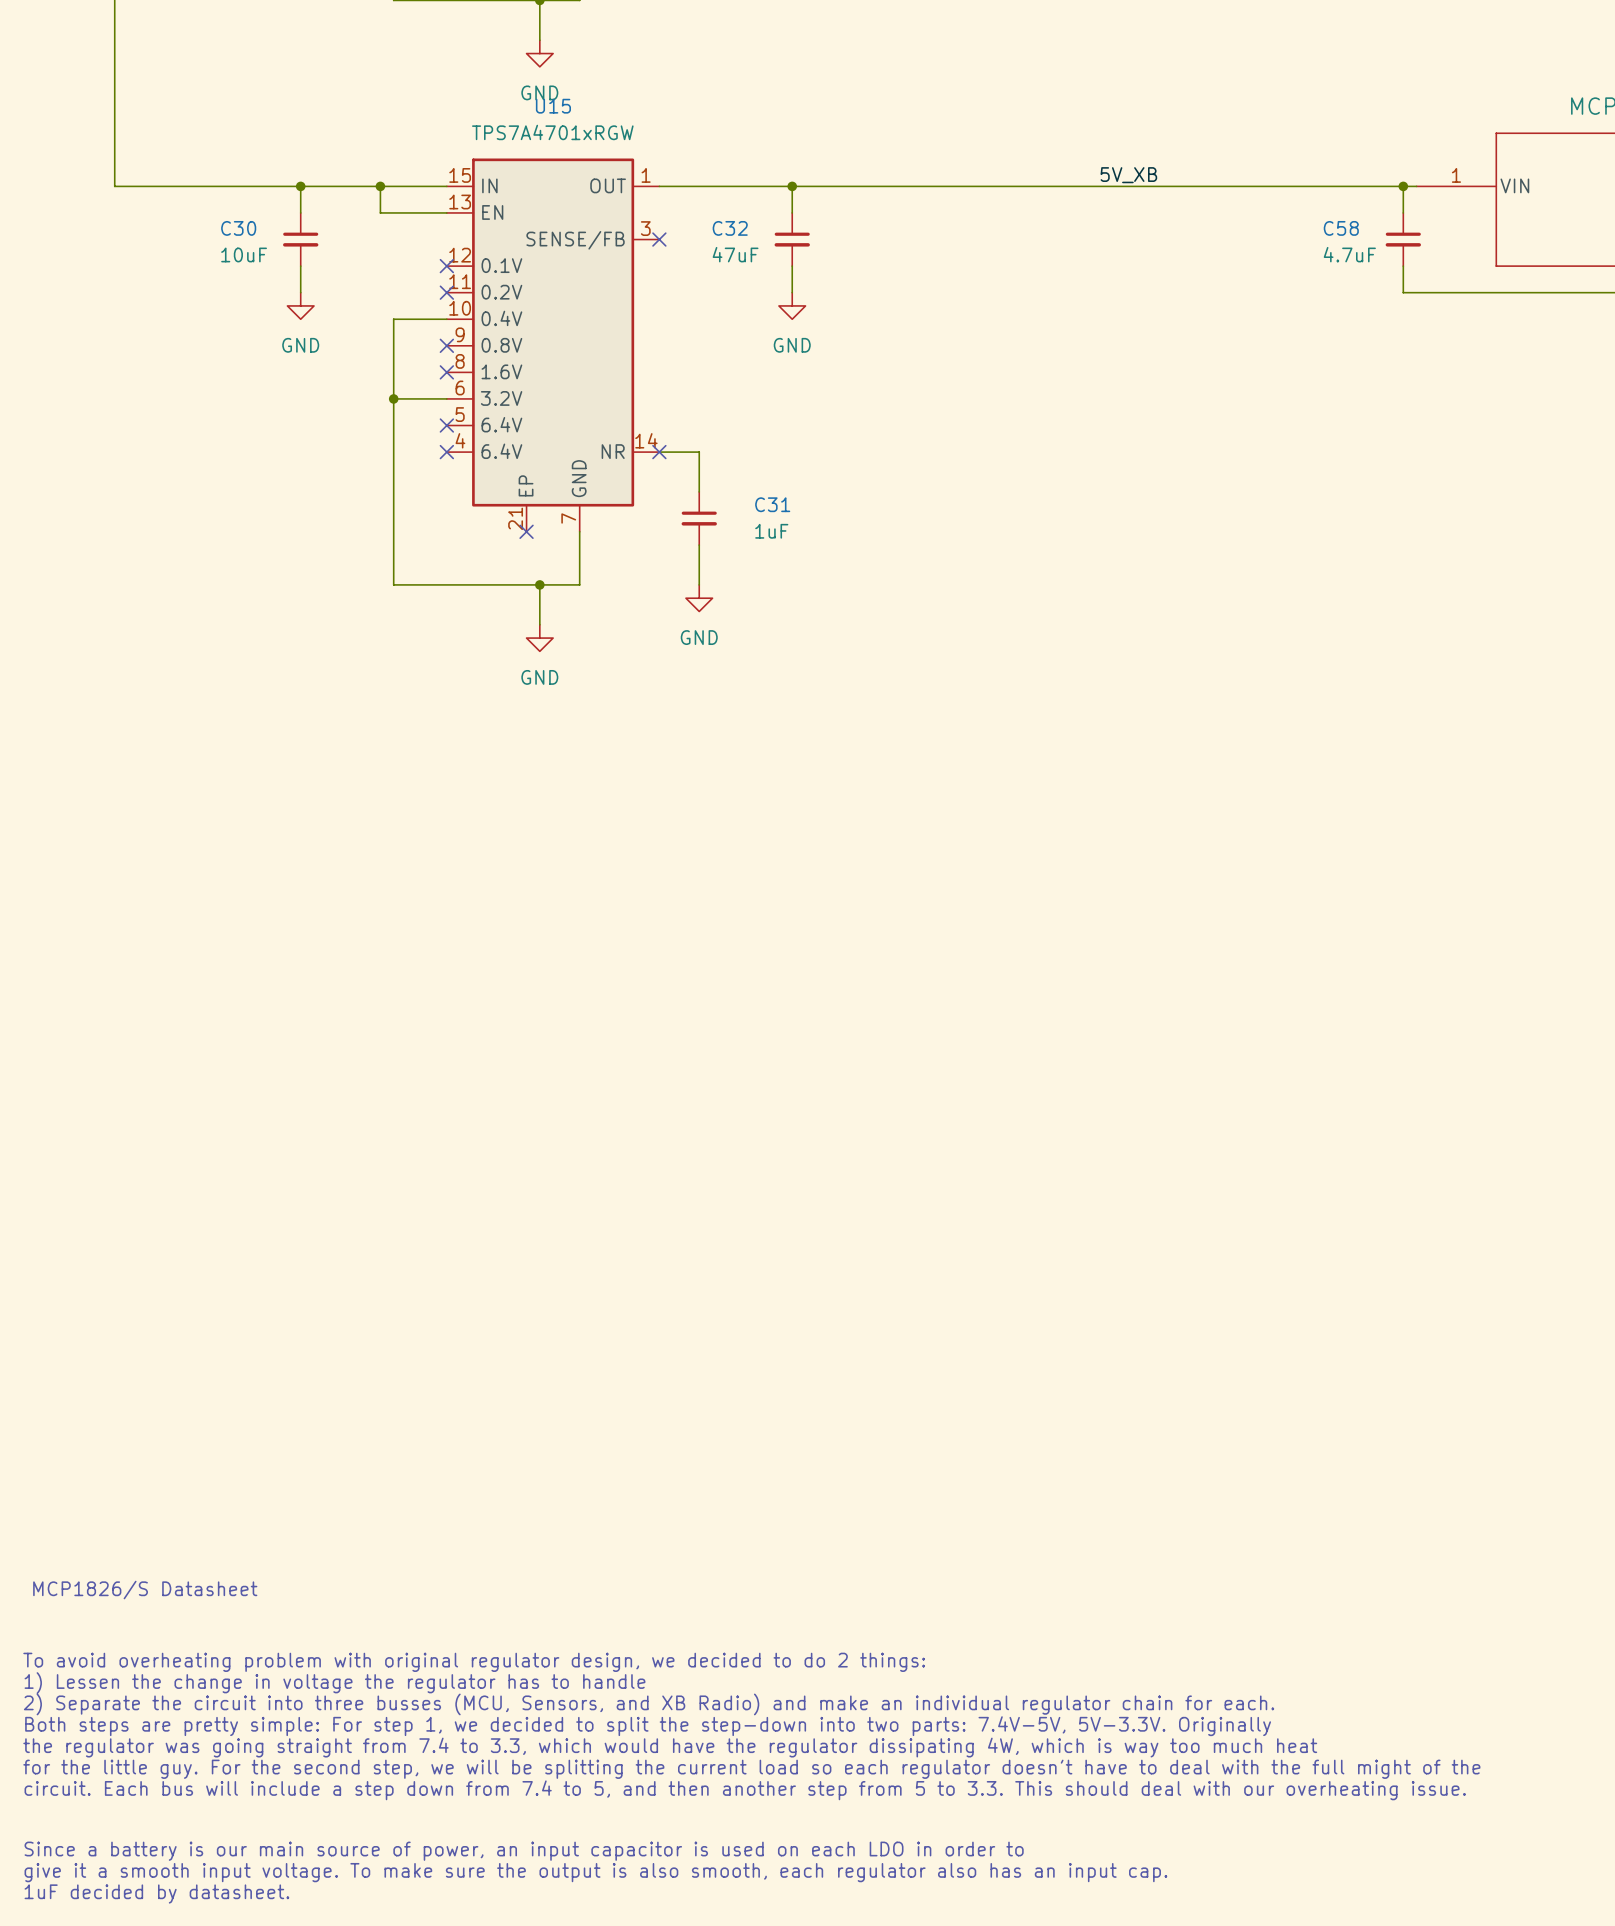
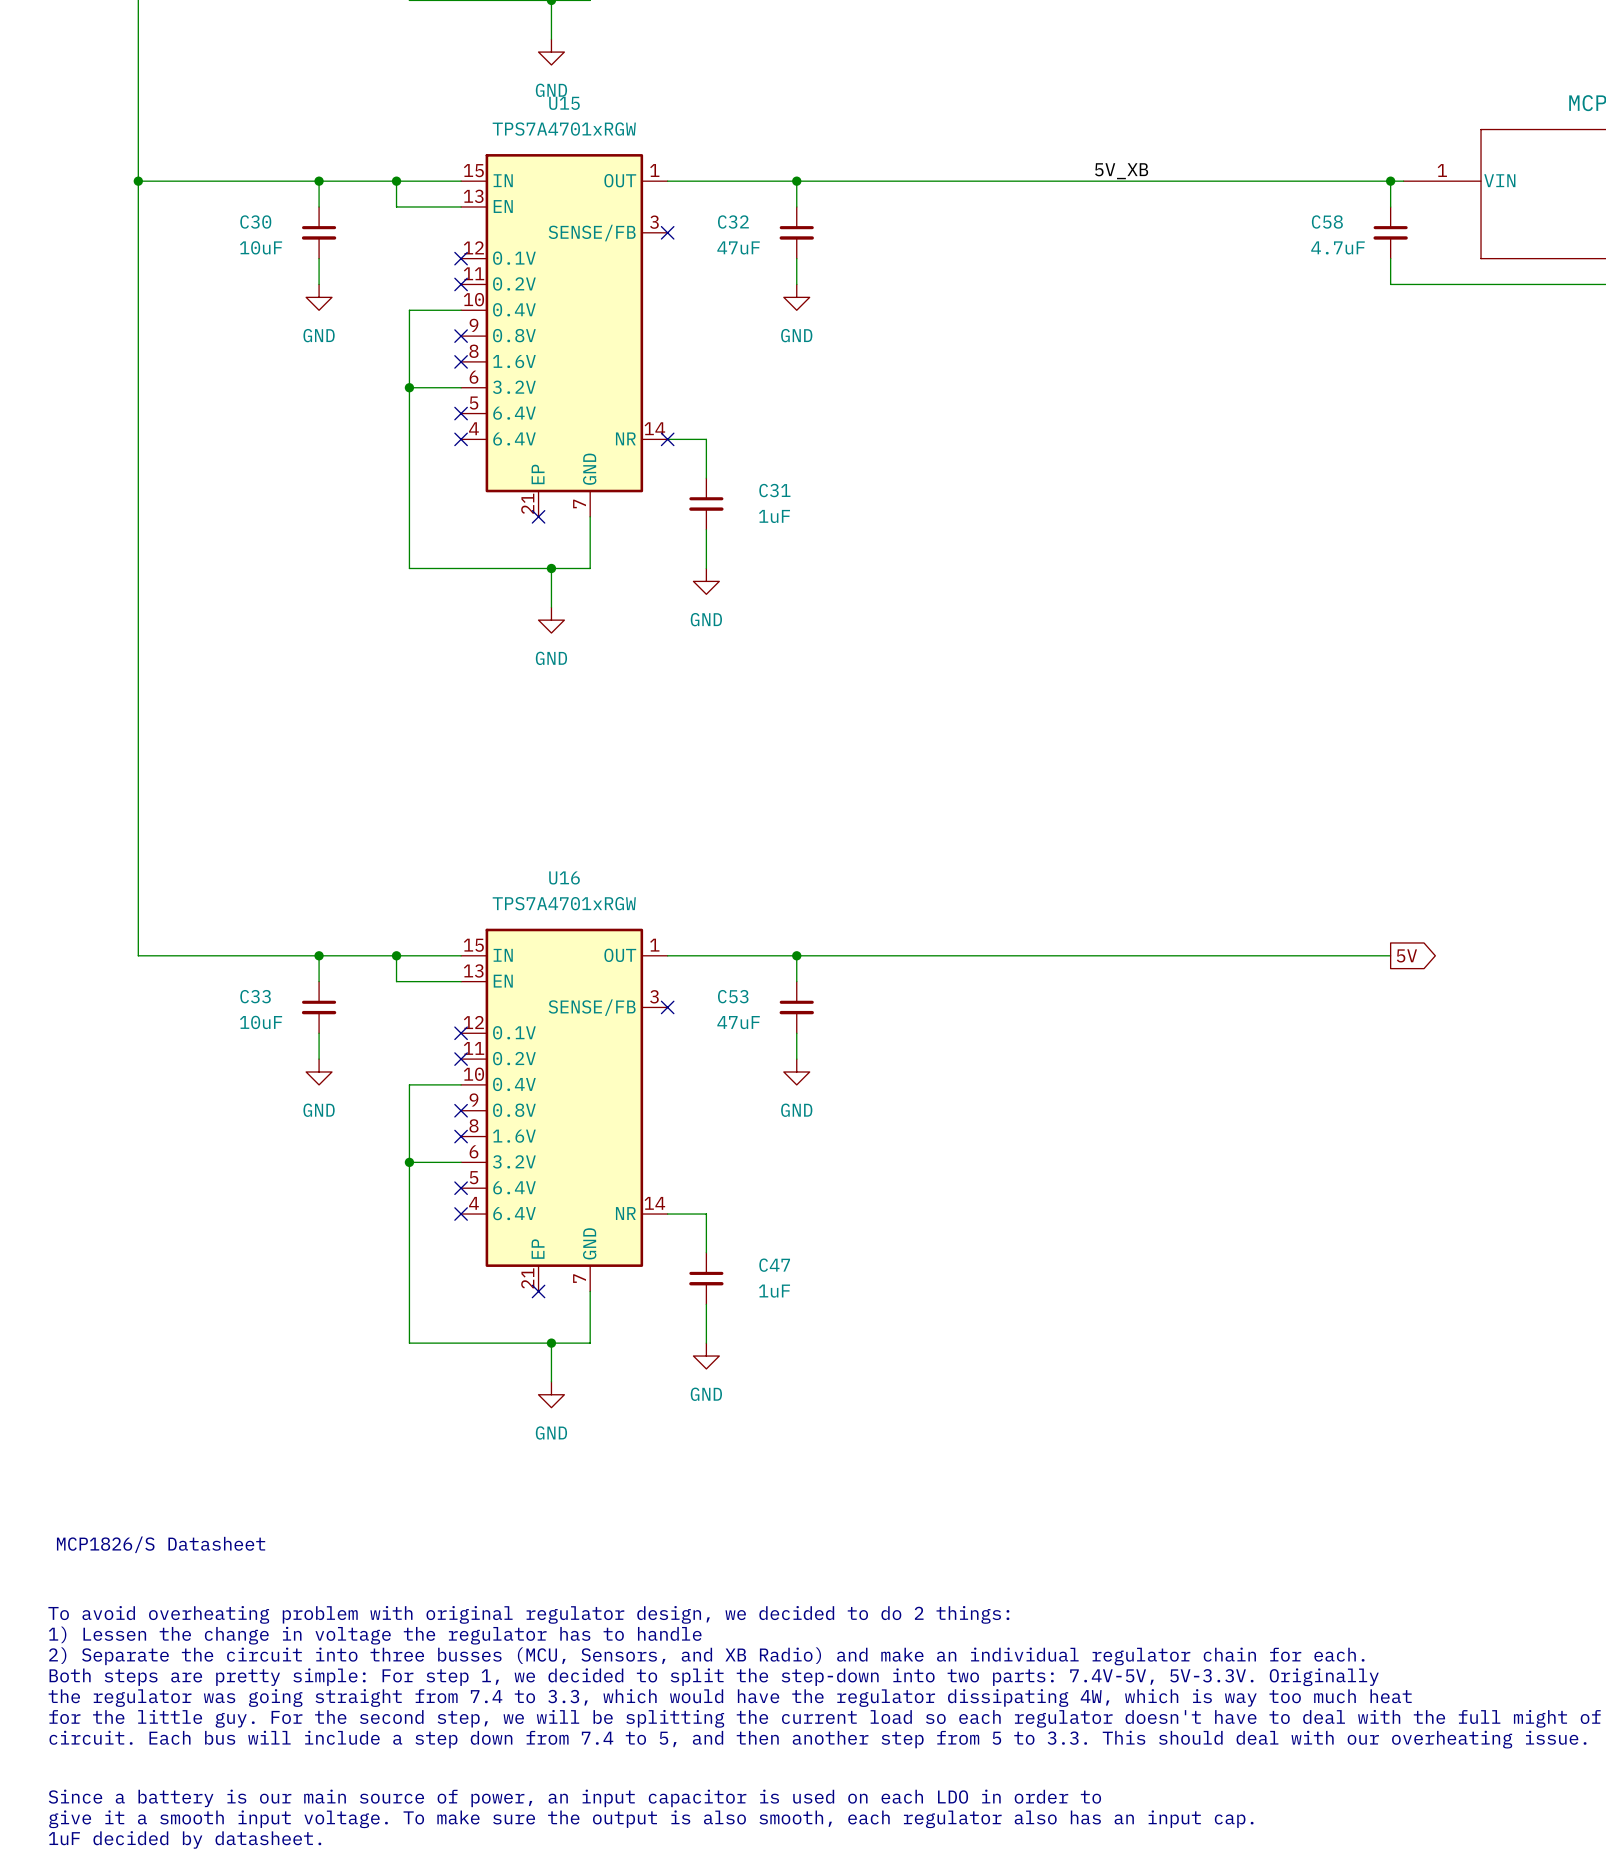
wire: none -> (138, 181) (138, 955) (461, 955)
junction: none -> (138, 181)
wire: none -> (319, 955) (319, 981)
junction: none -> (319, 955)
wire: none -> (396, 955) (396, 981) (461, 981)
junction: none -> (396, 955)
wire: none -> (667, 955) (1390, 955)
wire: none -> (796, 955) (796, 981)
junction: none -> (796, 955)
global label: none -> 5V (1406, 955)
C33: none -> 10uF (319, 1007)
no-connect mark: none -> (667, 1007)
C53: none -> 47uF (796, 1007)
wire: none -> (319, 1033) (319, 1059)
no-connect mark: none -> (461, 1033)
wire: none -> (796, 1033) (796, 1059)
no-connect mark: none -> (461, 1059)
power symbol: none -> GND (319, 1071)
power symbol: none -> GND (796, 1071)
wire: none -> (461, 1084) (409, 1084) (409, 1343) (590, 1343) (590, 1291)
no-connect mark: none -> (461, 1110)
U16: none -> TPS7A4701xRGW (564, 1110)
no-connect mark: none -> (461, 1136)
wire: none -> (409, 1162) (461, 1162)
junction: none -> (409, 1162)
no-connect mark: none -> (461, 1188)
no-connect mark: none -> (461, 1214)
wire: none -> (667, 1214) (706, 1214) (706, 1252)
C47: none -> 1uF (706, 1278)
no-connect mark: none -> (538, 1291)
wire: none -> (706, 1304) (706, 1343)
wire: none -> (551, 1343) (551, 1381)
junction: none -> (551, 1343)
power symbol: none -> GND (706, 1356)
power symbol: none -> GND (551, 1394)

